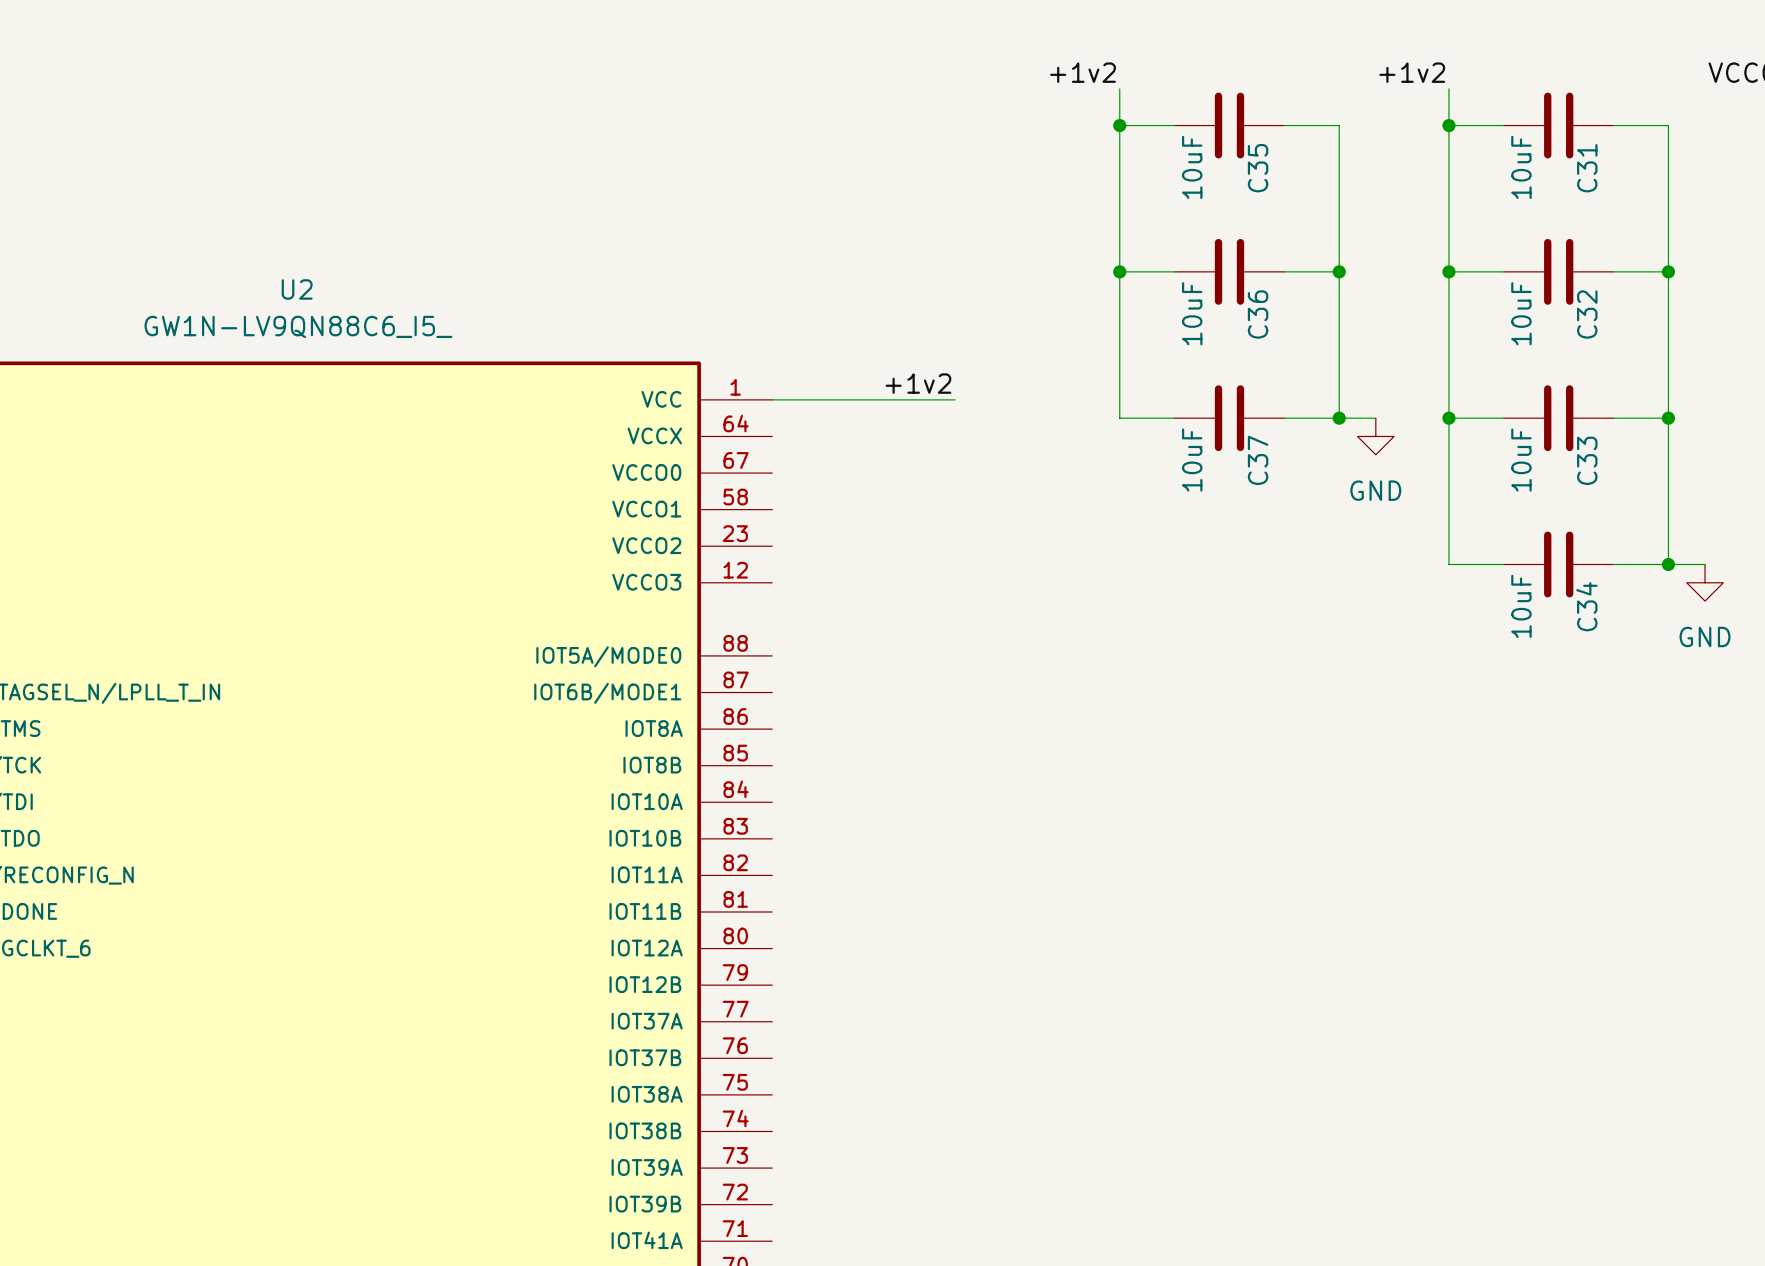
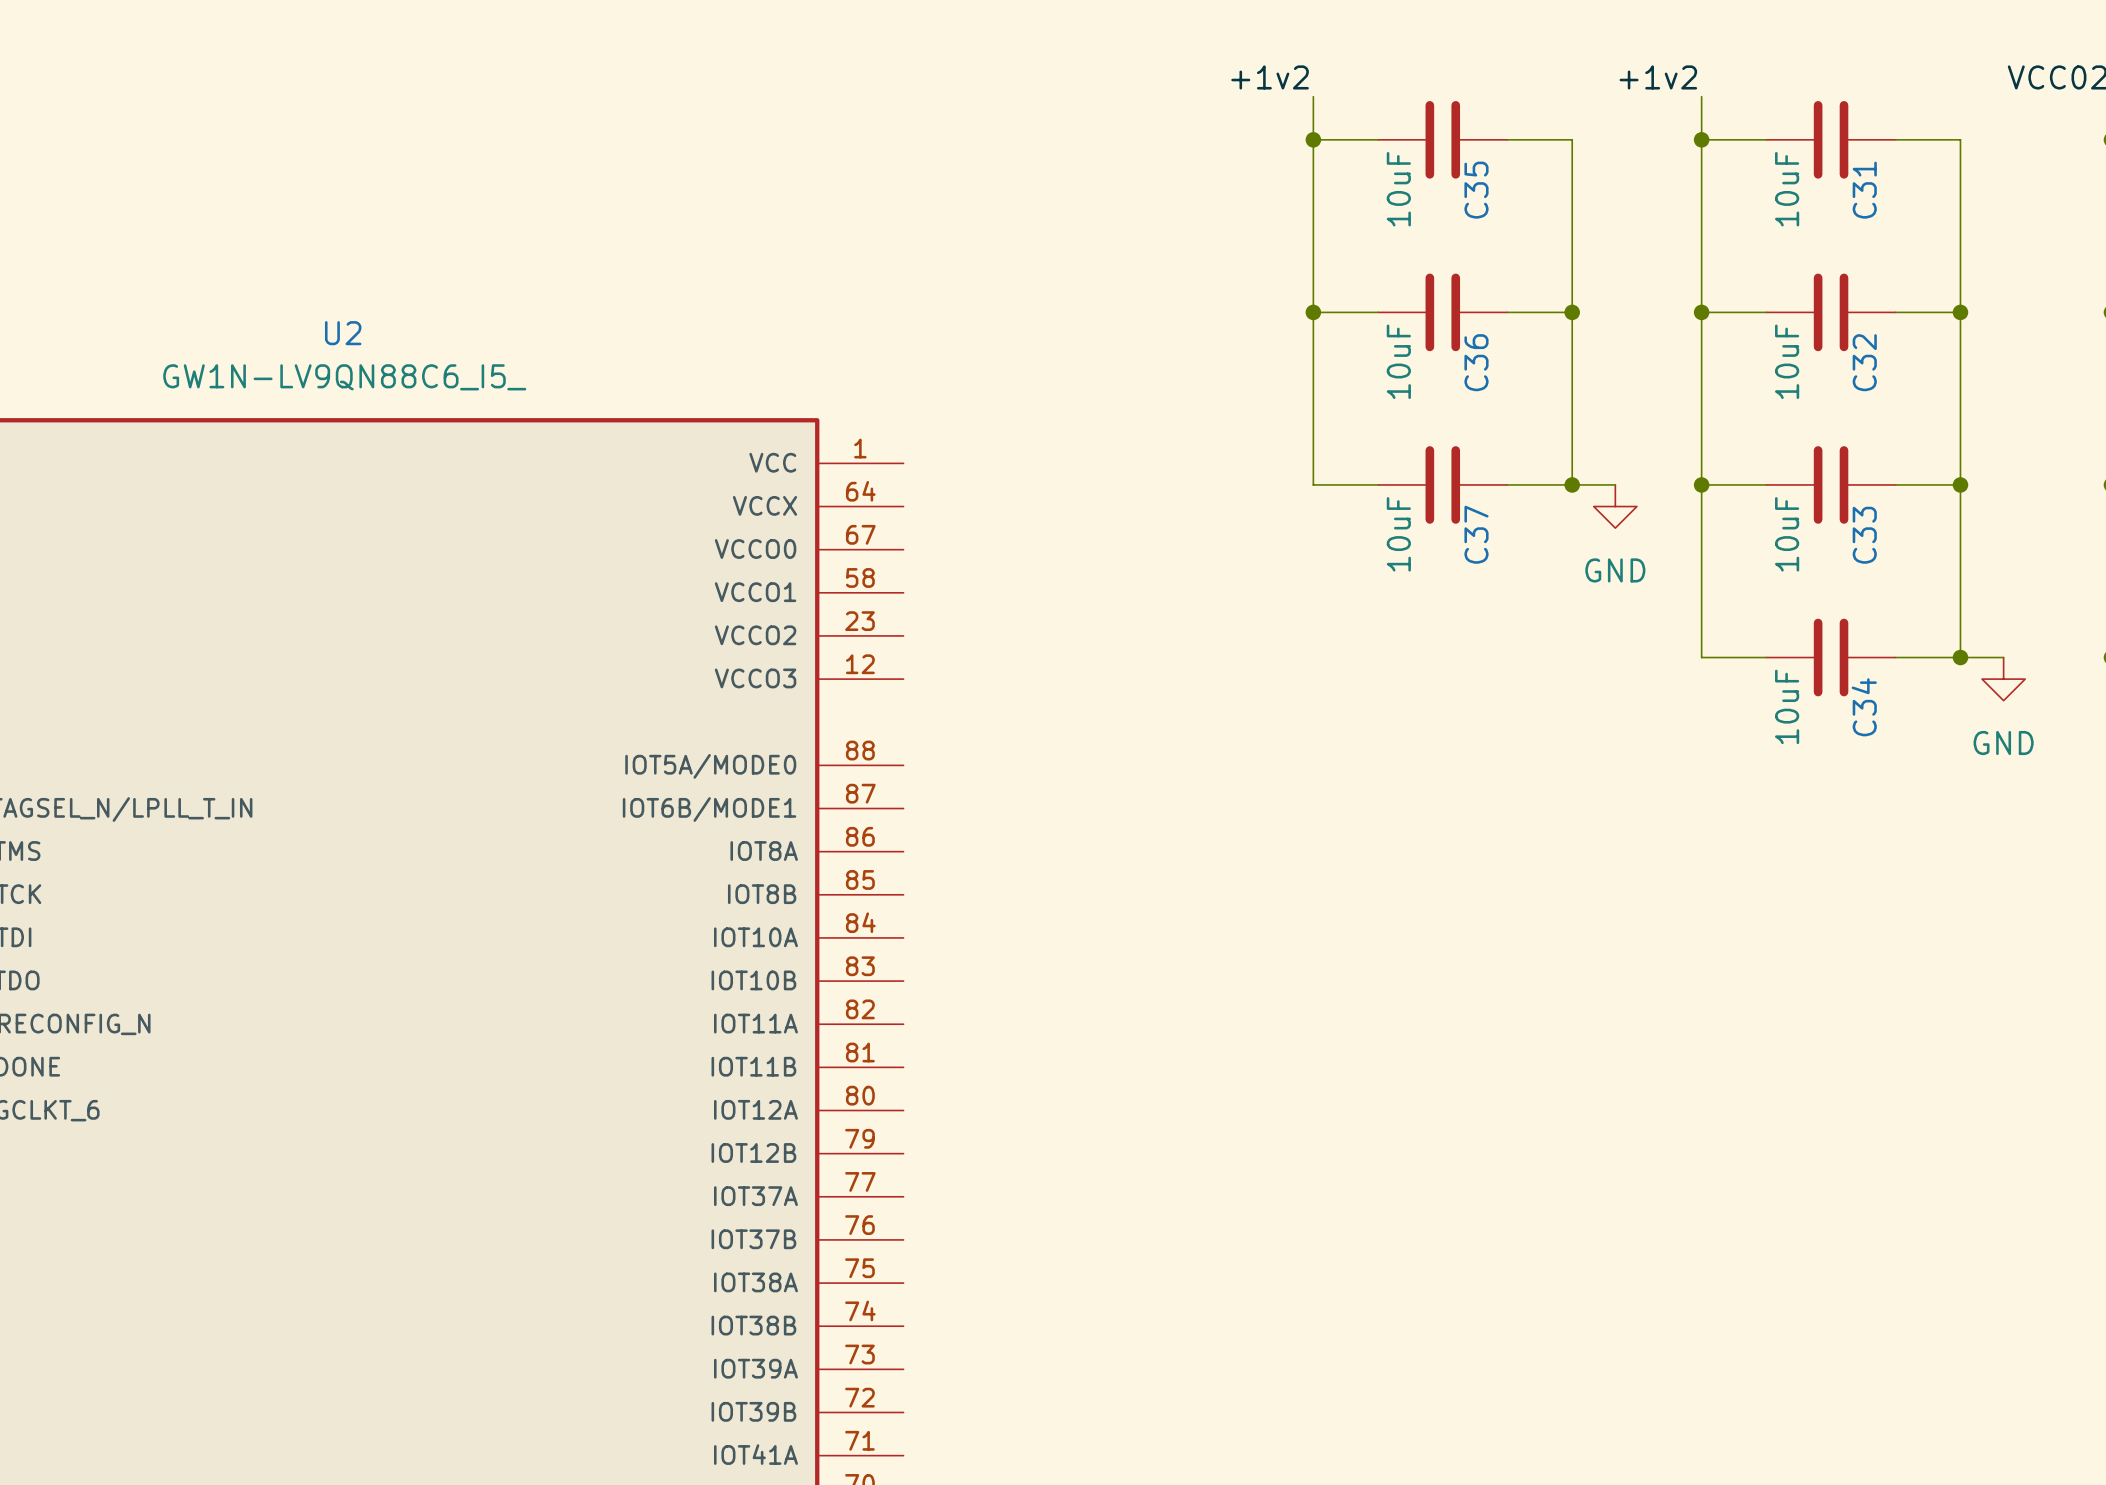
label: +1v2 (918, 383) -> none
wire: (772, 399) (955, 399) -> none

